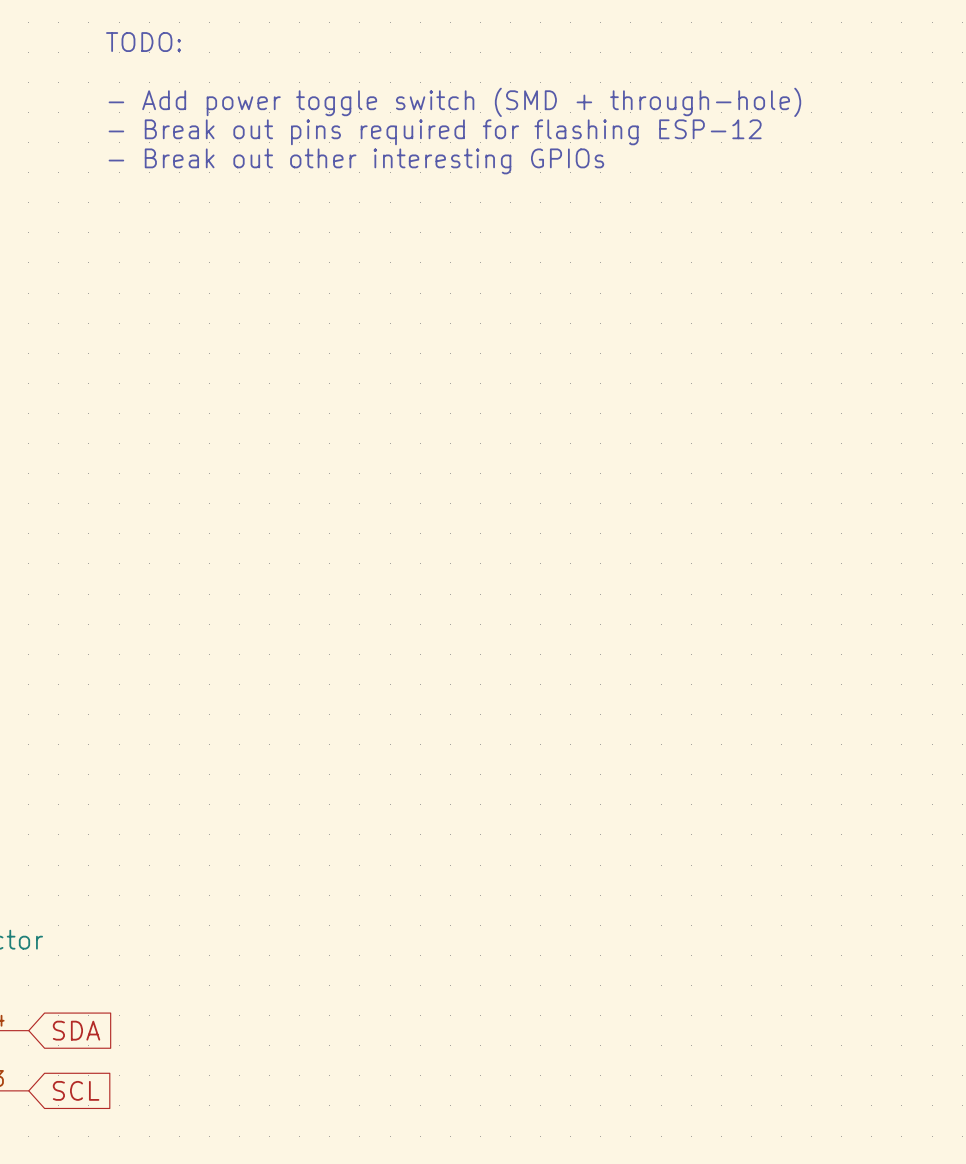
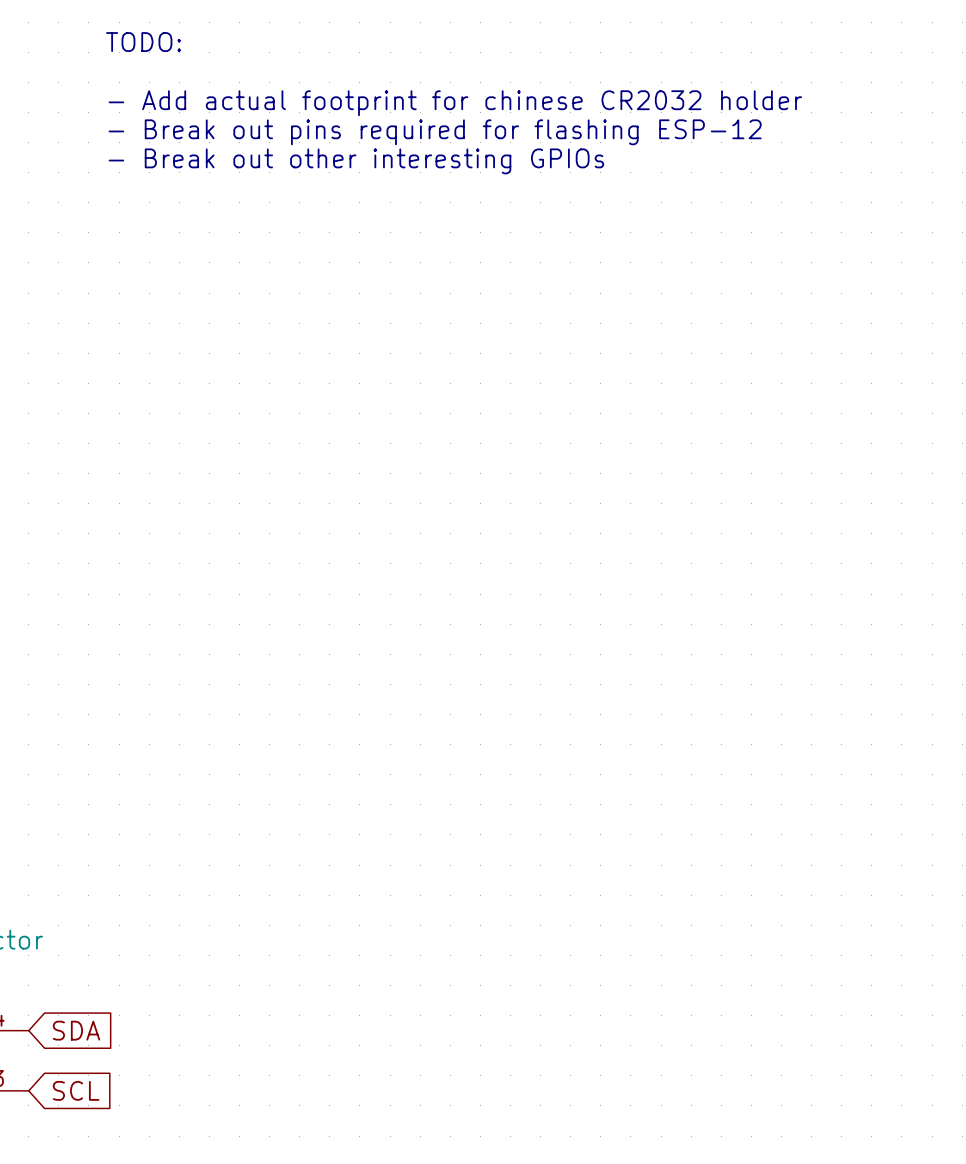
text: - Add power toggle switch (SMD + through-hole) (454, 102) -> - Add actual footprint for chinese CR2032 holder (455, 103)

